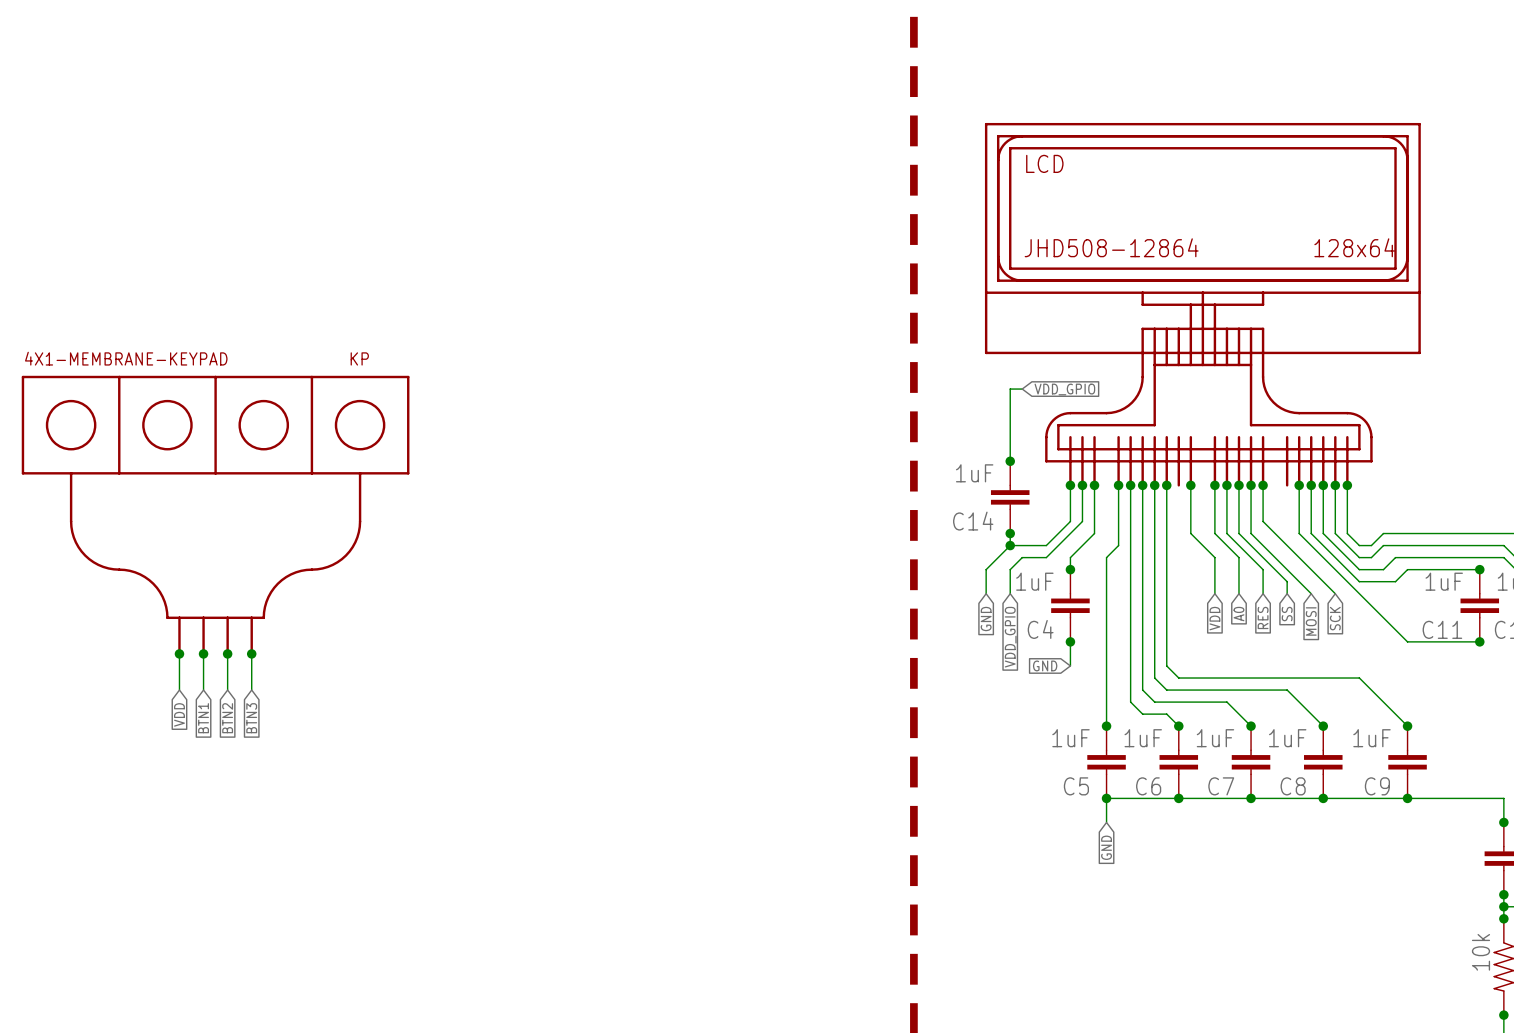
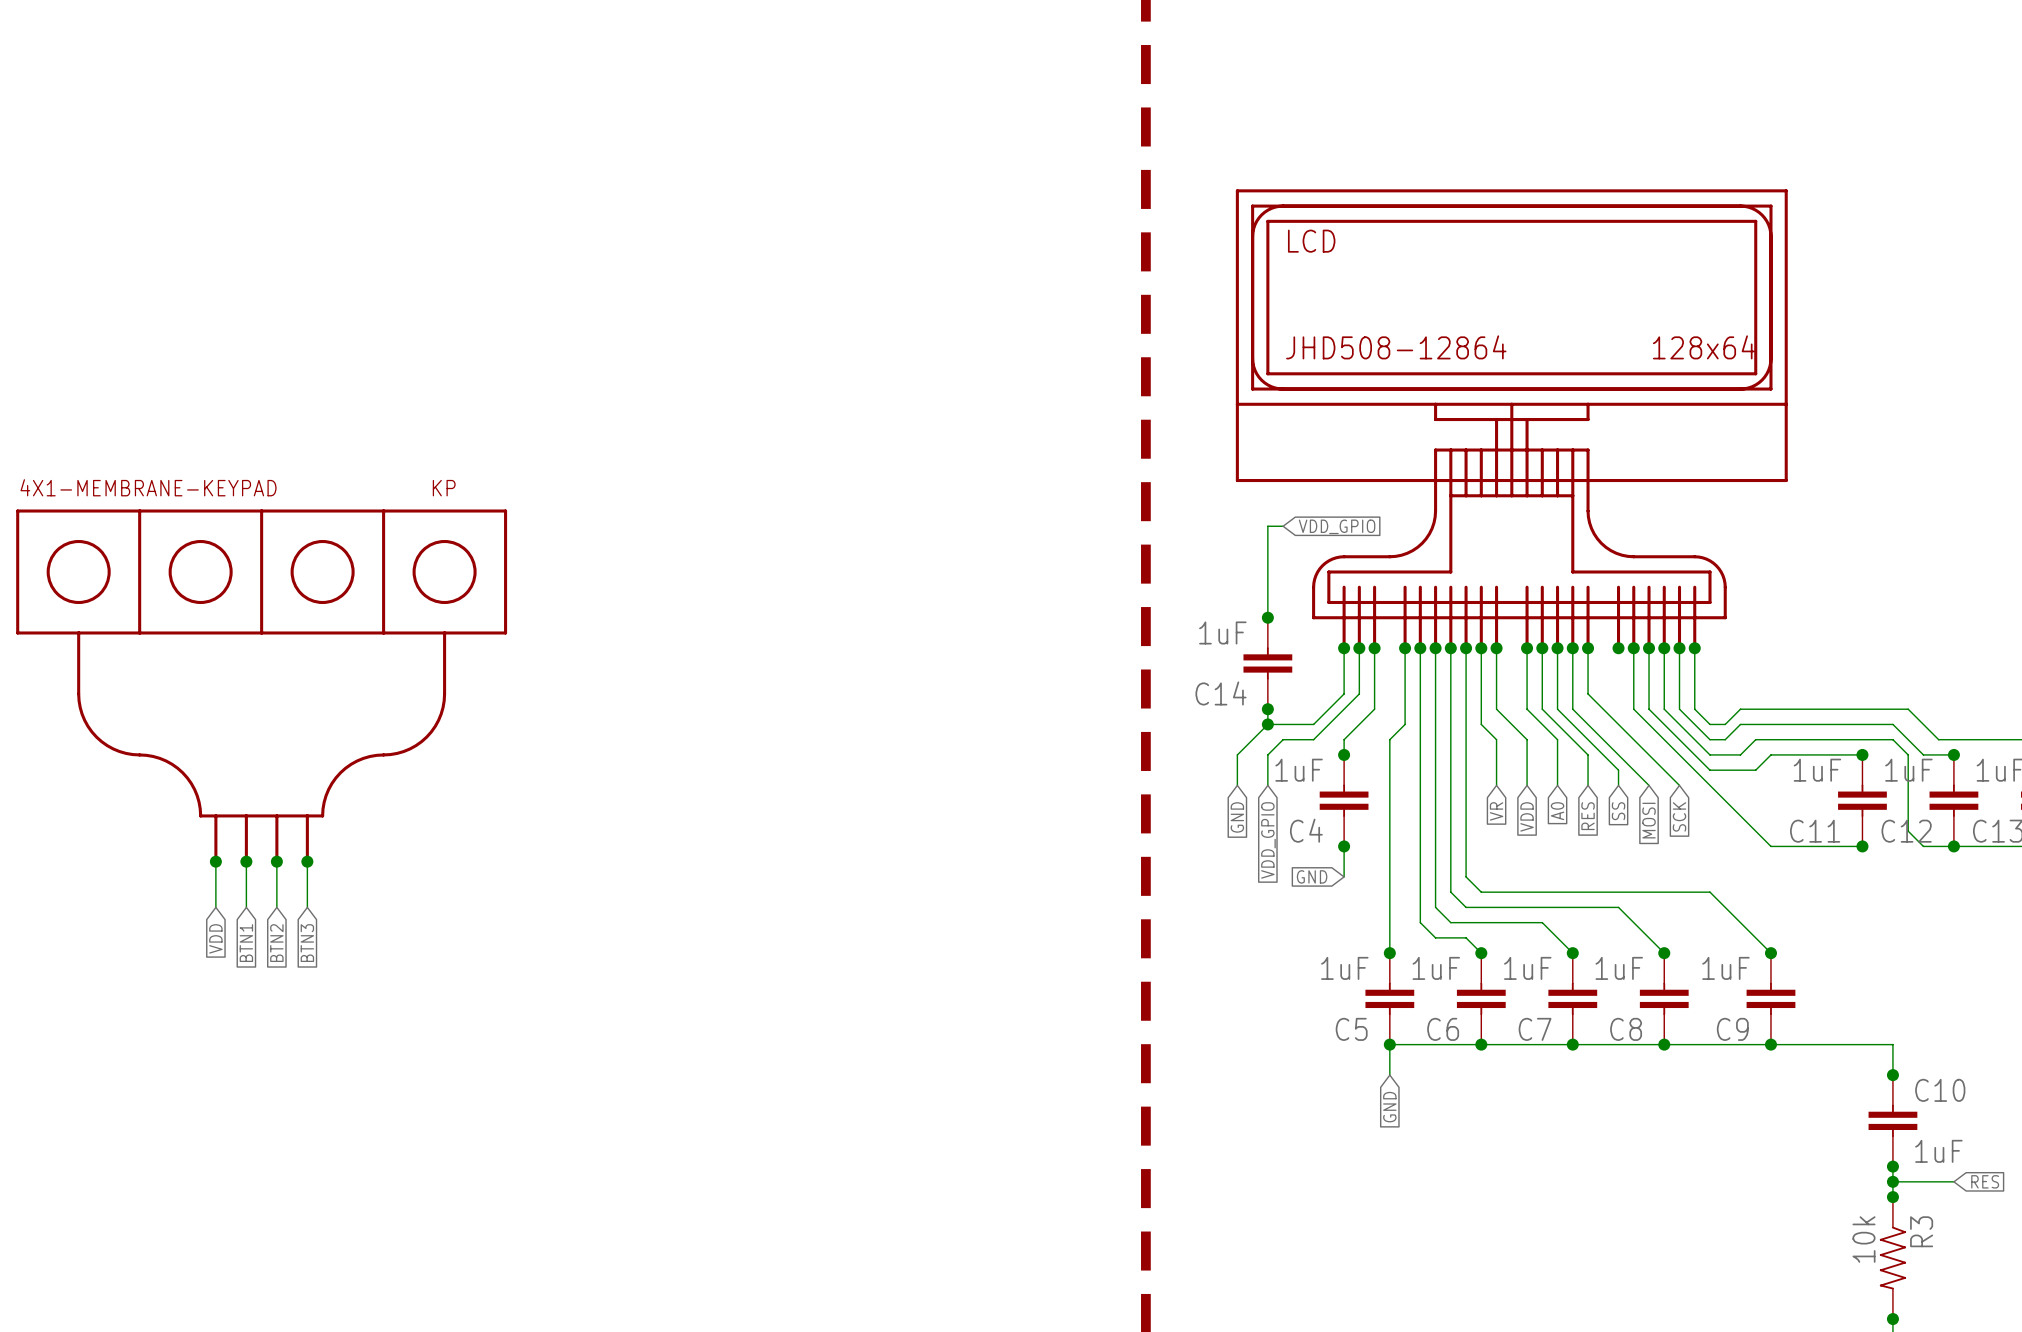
wire: none -> (1481, 648) (1481, 724) (1496, 739) (1496, 785)
junction: none -> (1481, 648)
junction: none -> (1618, 648)
global label: none -> VR (1496, 811)

